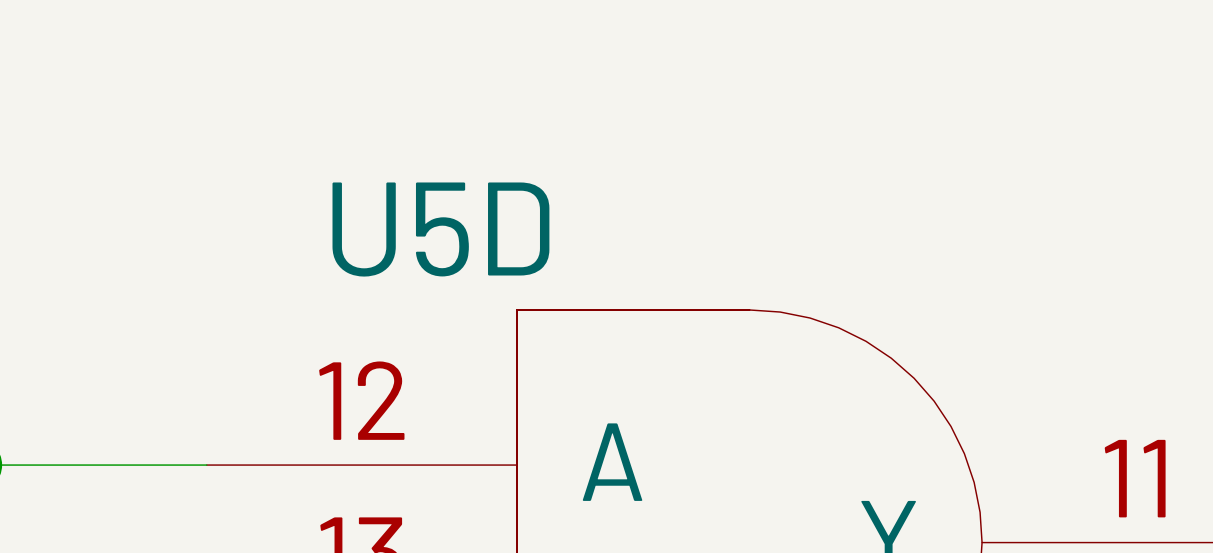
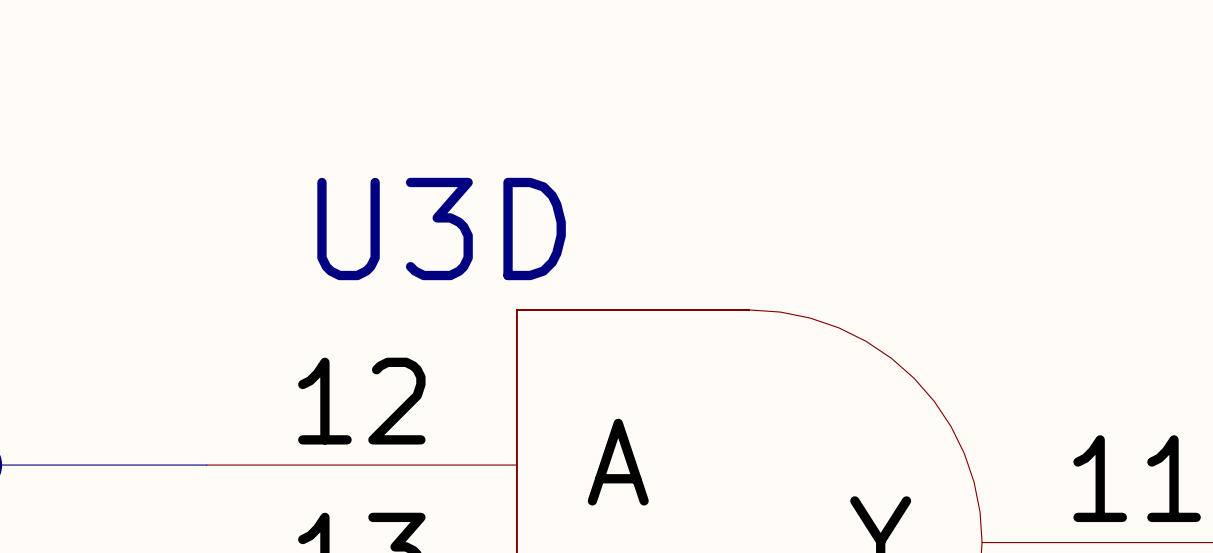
U5D name: U5D (440, 229) -> U3D (441, 228)

